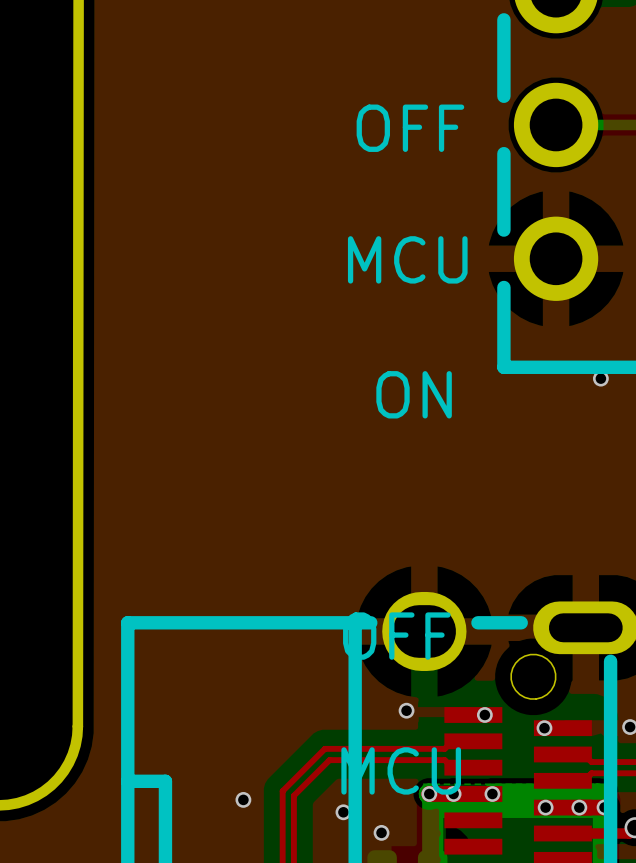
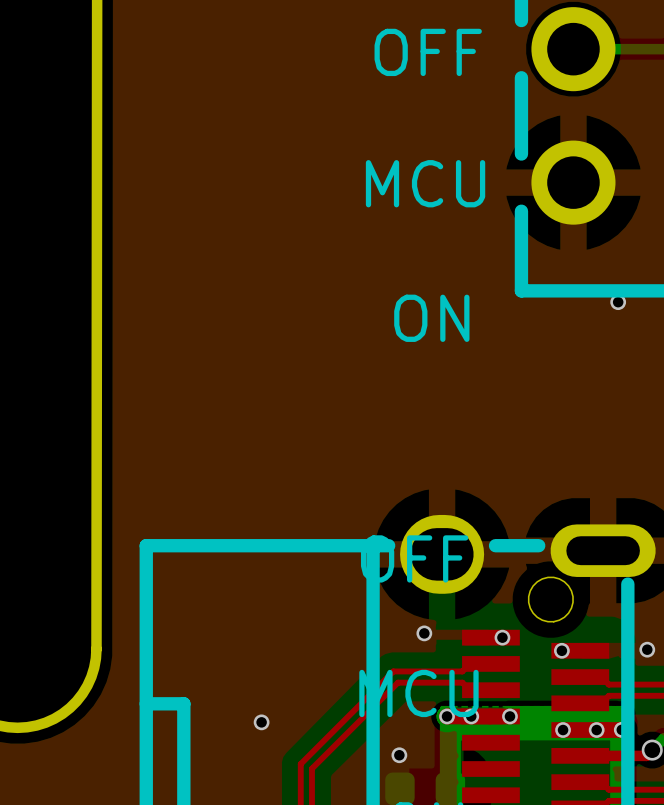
top track: (375, 748) (324, 748) (282, 791) (282, 841) -> (393, 671) (300, 764)
top track: (380, 760) (329, 760) (293, 795) (293, 846) -> (397, 682) (311, 768)
via: (343, 812) -> none

